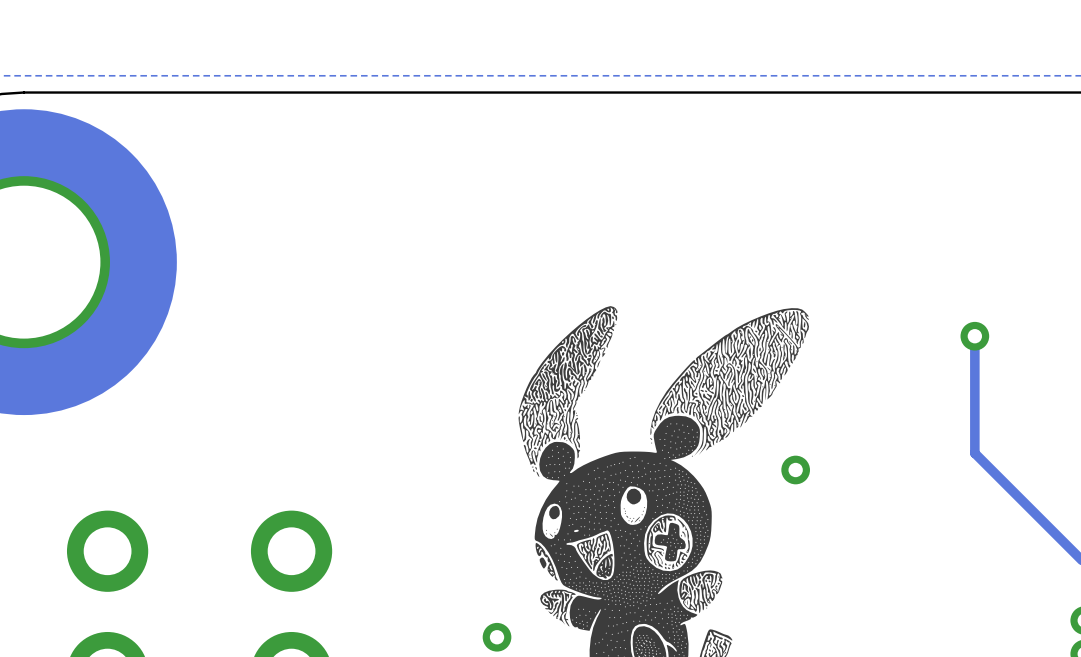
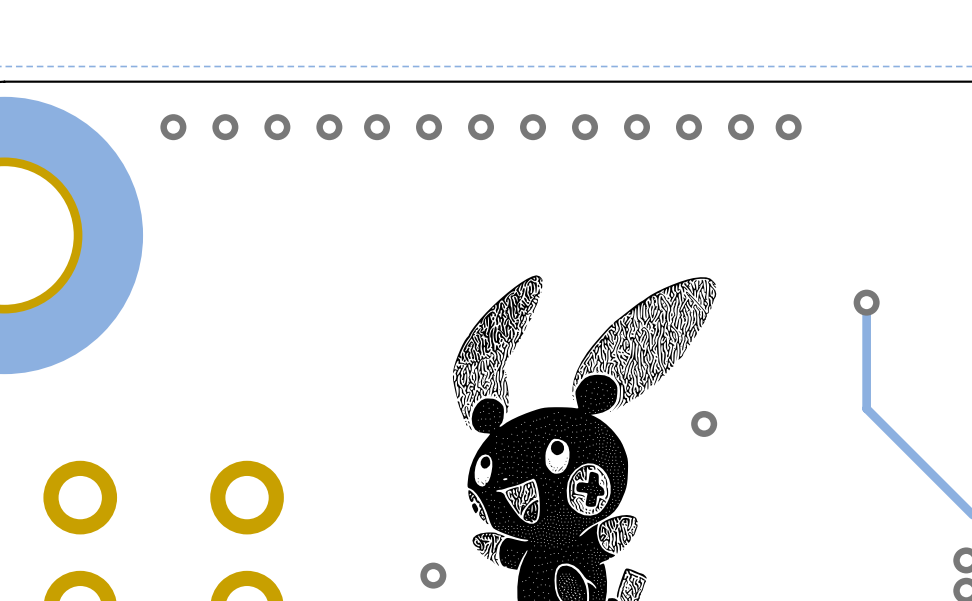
via: none -> (173, 127)
via: none -> (225, 127)
via: none -> (277, 127)
via: none -> (329, 127)
via: none -> (377, 127)
via: none -> (429, 127)
via: none -> (481, 127)
via: none -> (533, 127)
via: none -> (585, 127)
via: none -> (637, 127)
via: none -> (688, 127)
via: none -> (740, 127)
via: none -> (788, 127)

